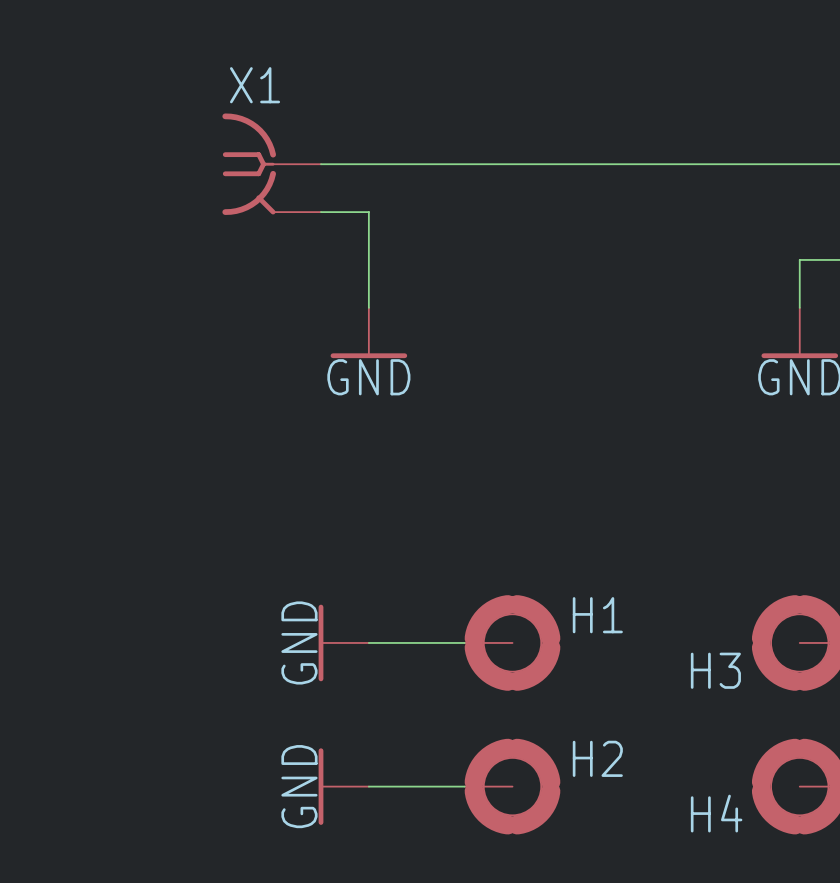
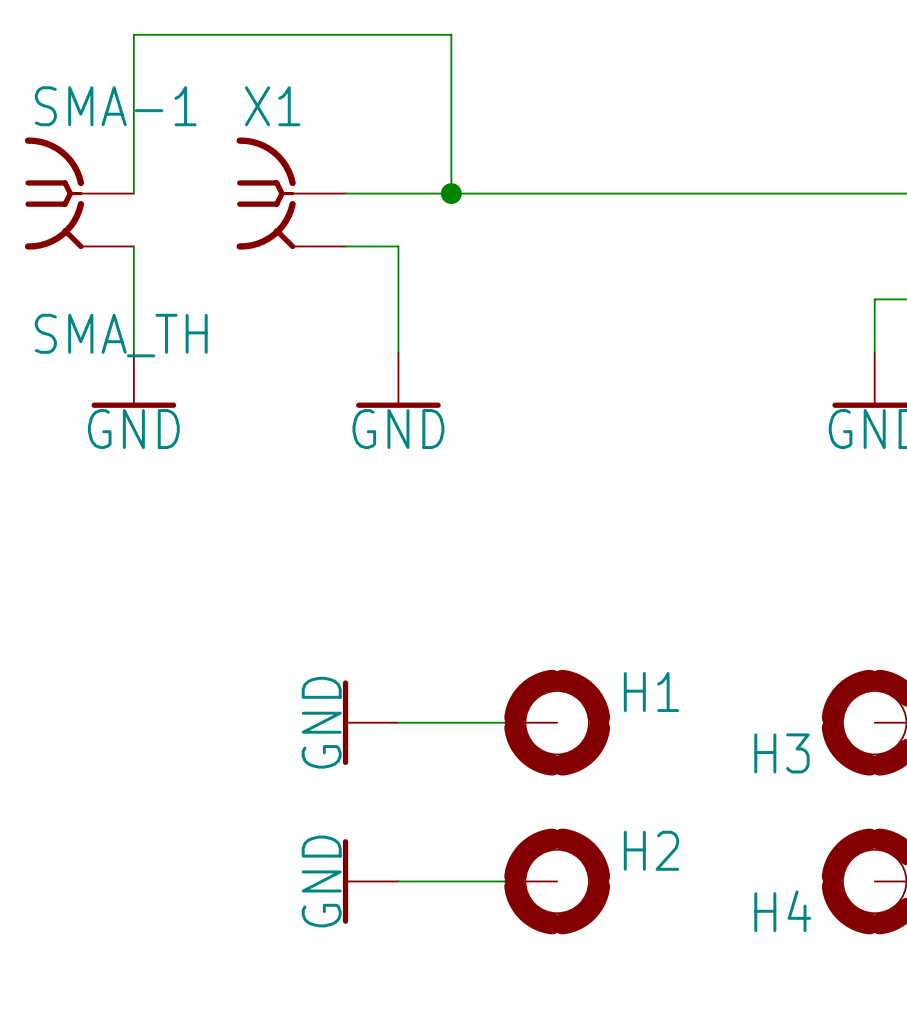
SMA-1: none -> SMA_TH (79, 193)
wire: none -> (133, 193) (133, 34) (451, 34) (451, 193)
junction: none -> (451, 193)
wire: none -> (133, 246) (133, 352)
power symbol: none -> GND (133, 380)

